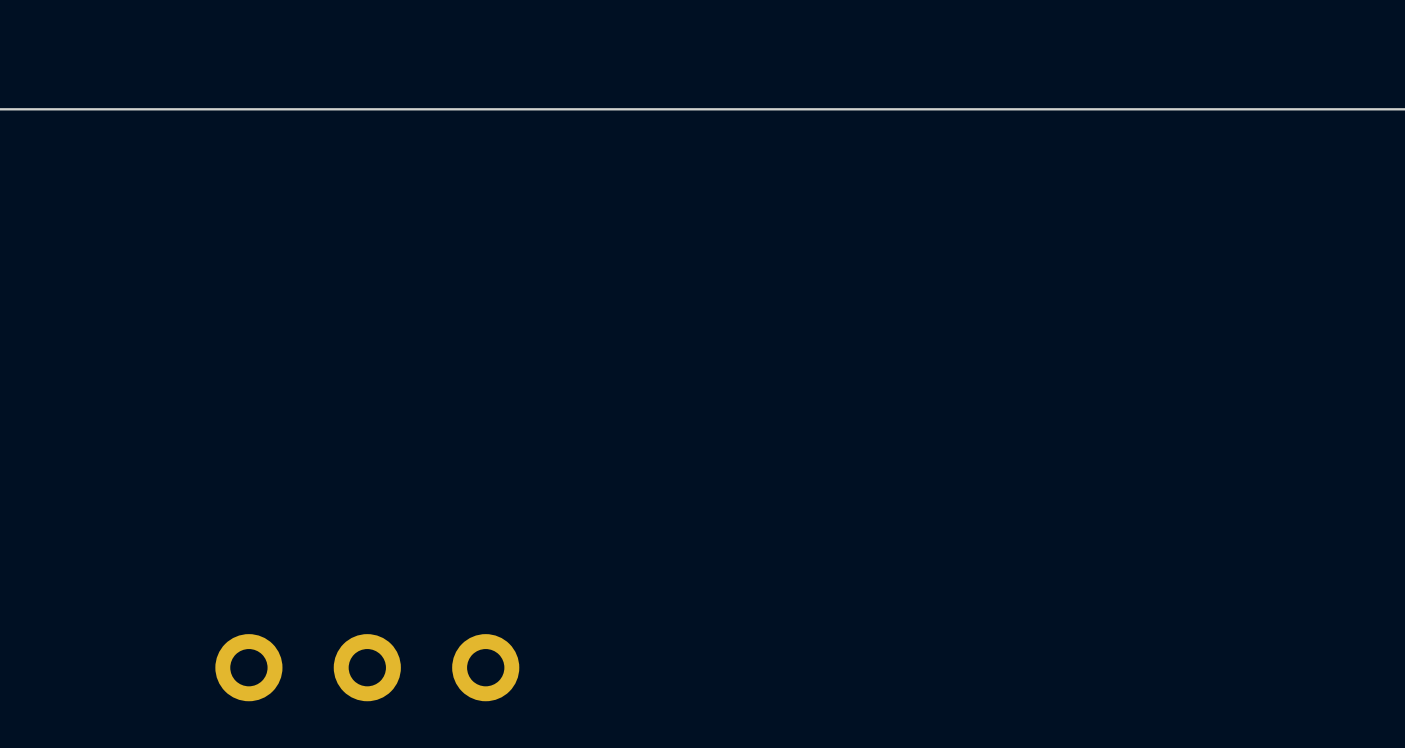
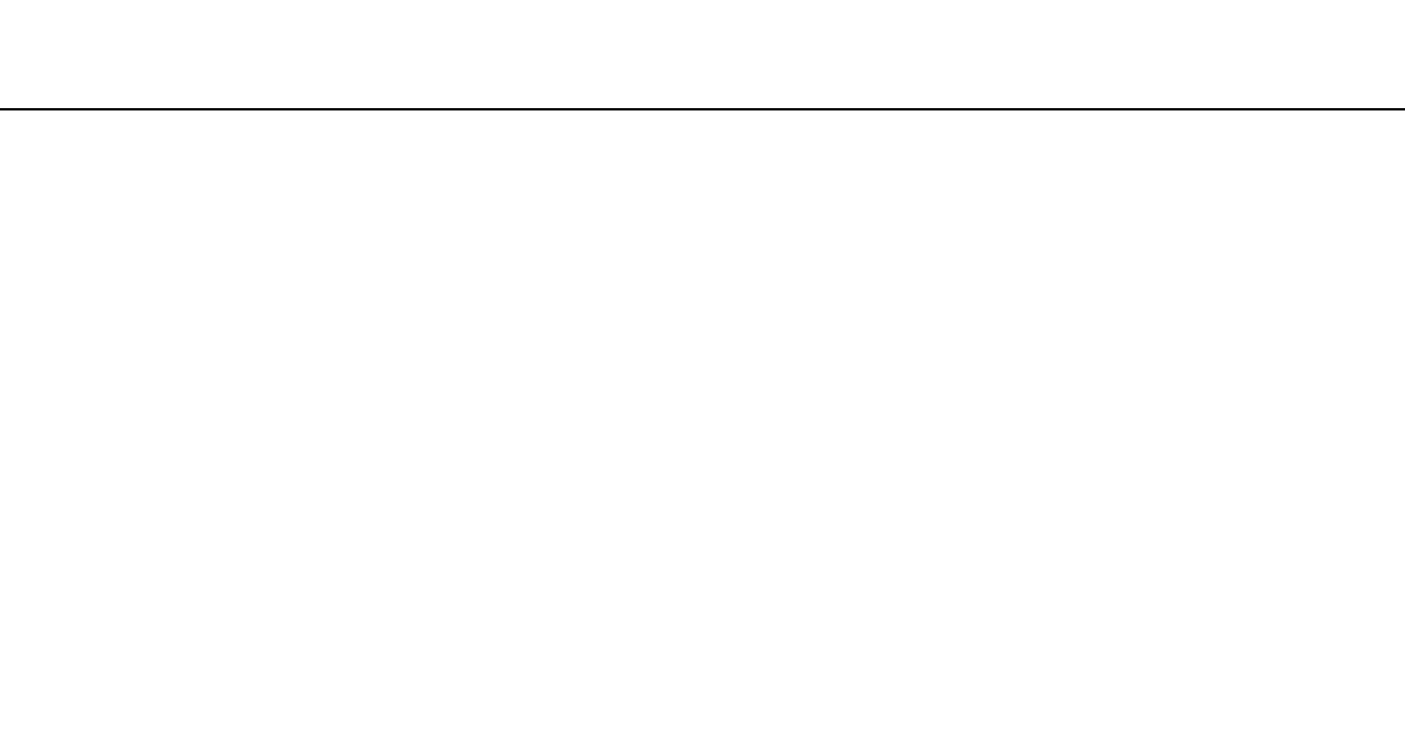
part: (367, 667) -> none

